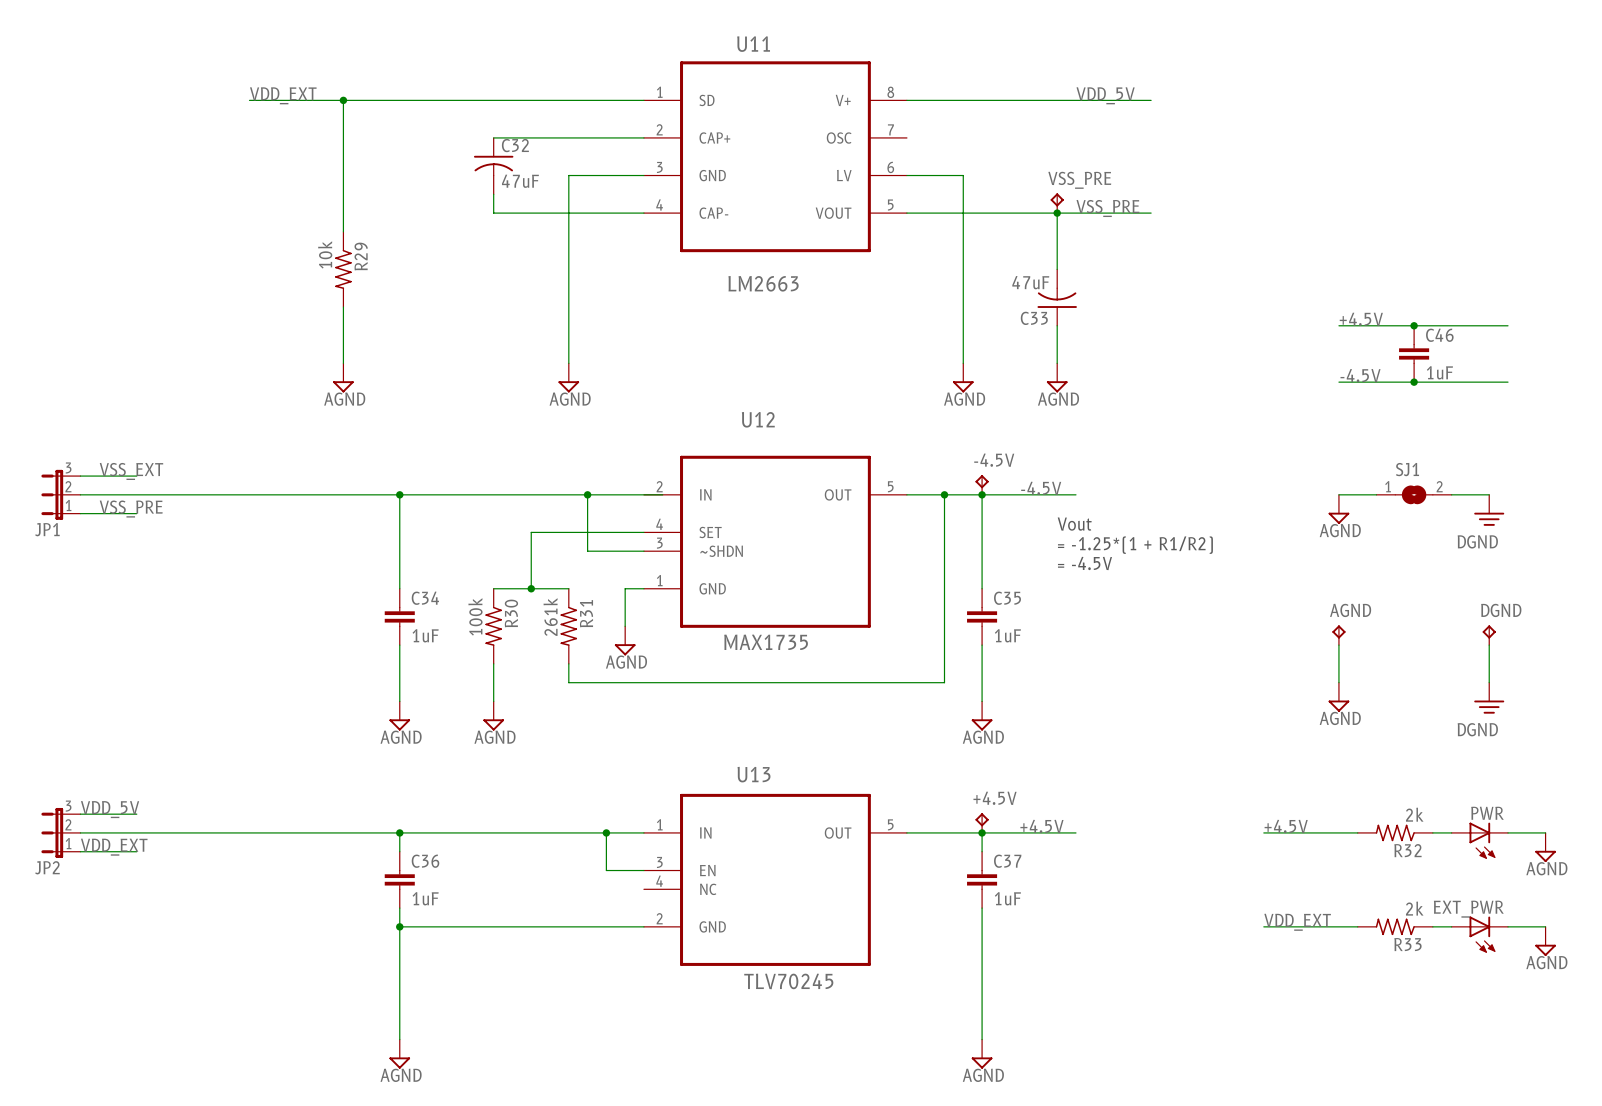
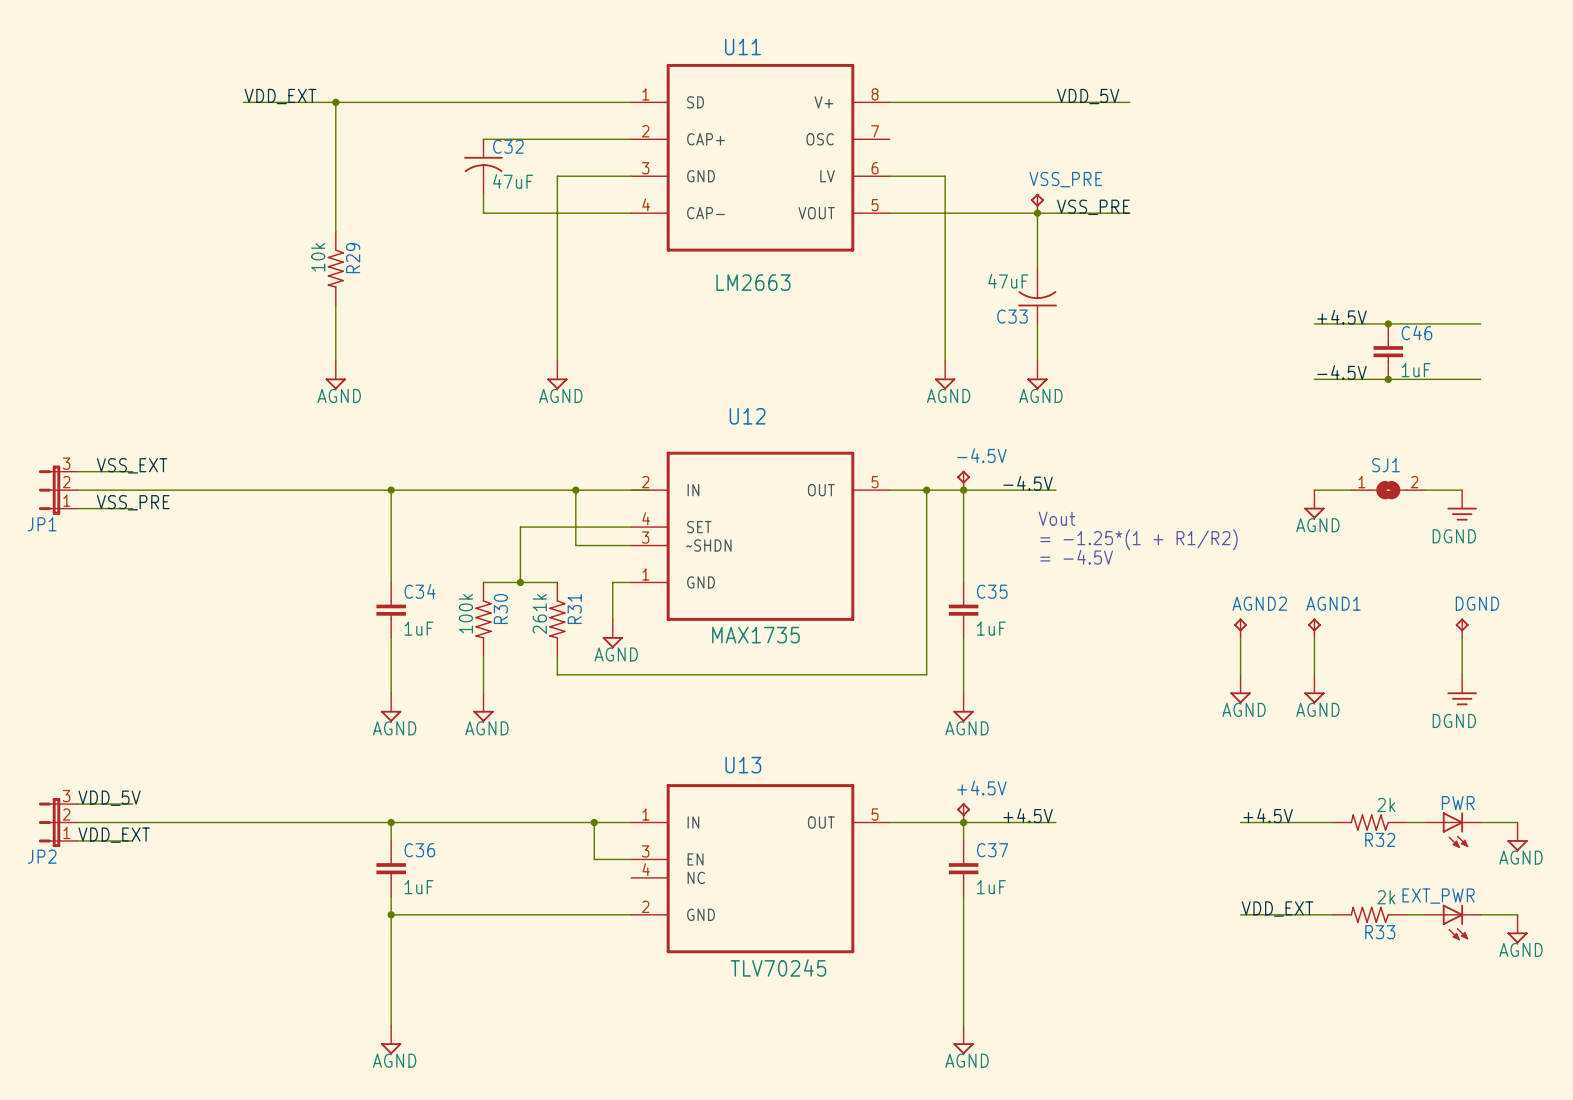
AGND name: AGND (1350, 610) -> AGND1 (1333, 603)
AGND2: none -> (1240, 628)
wire: none -> (1240, 637) (1240, 674)
power symbol: none -> AGND (1240, 689)

